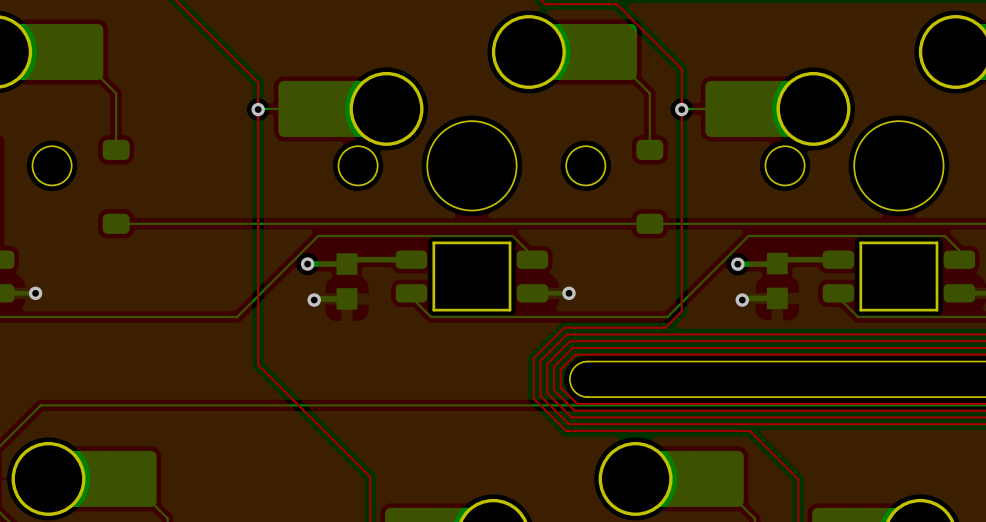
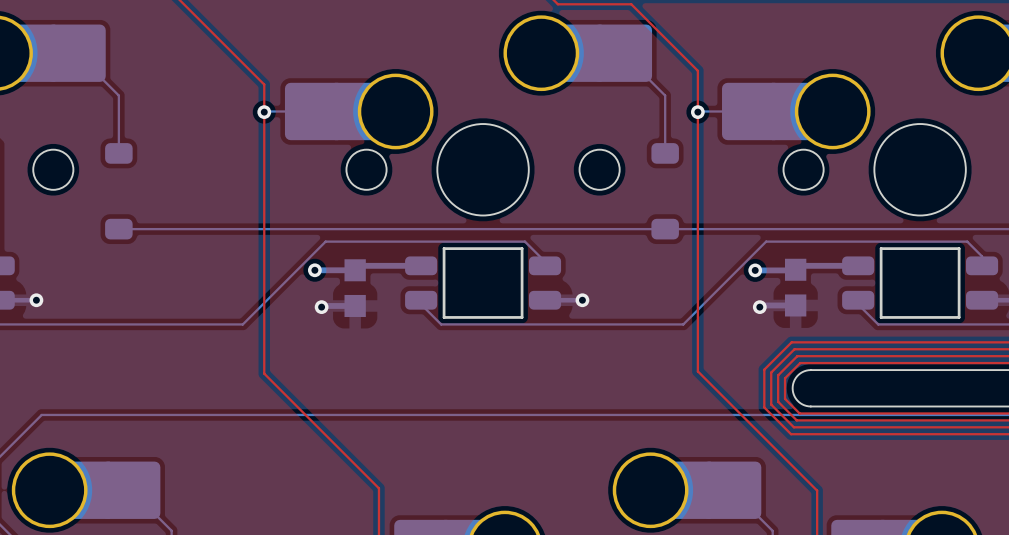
top track: (681, 311) (665, 327) (564, 327) (533, 358) (533, 398) (566, 430) (749, 430) -> (697, 318) (697, 371) (767, 441)
top track: (773, 334) (567, 334) (540, 361) (540, 395) (568, 424) (772, 424) -> (791, 342) (764, 369) (764, 407) (791, 434)
top track: (776, 341) (569, 341) (547, 363) (547, 393) (571, 417) (775, 417) -> (794, 349) (771, 372) (771, 404) (793, 427)
top track: (778, 347) (572, 347) (553, 366) (553, 390) (574, 410) (778, 410) -> (797, 356) (778, 375) (778, 401) (796, 420)
top track: (781, 354) (575, 354) (560, 369) (560, 387) (577, 403) (781, 403) -> (800, 363) (785, 378) (785, 398) (799, 413)
board edge: (792, 361) (585, 361) (573, 368) (569, 379) (573, 390) (585, 396) (792, 397) -> (810, 370) (802, 372) (797, 376) (792, 388) (794, 396) (798, 401) (810, 406)

